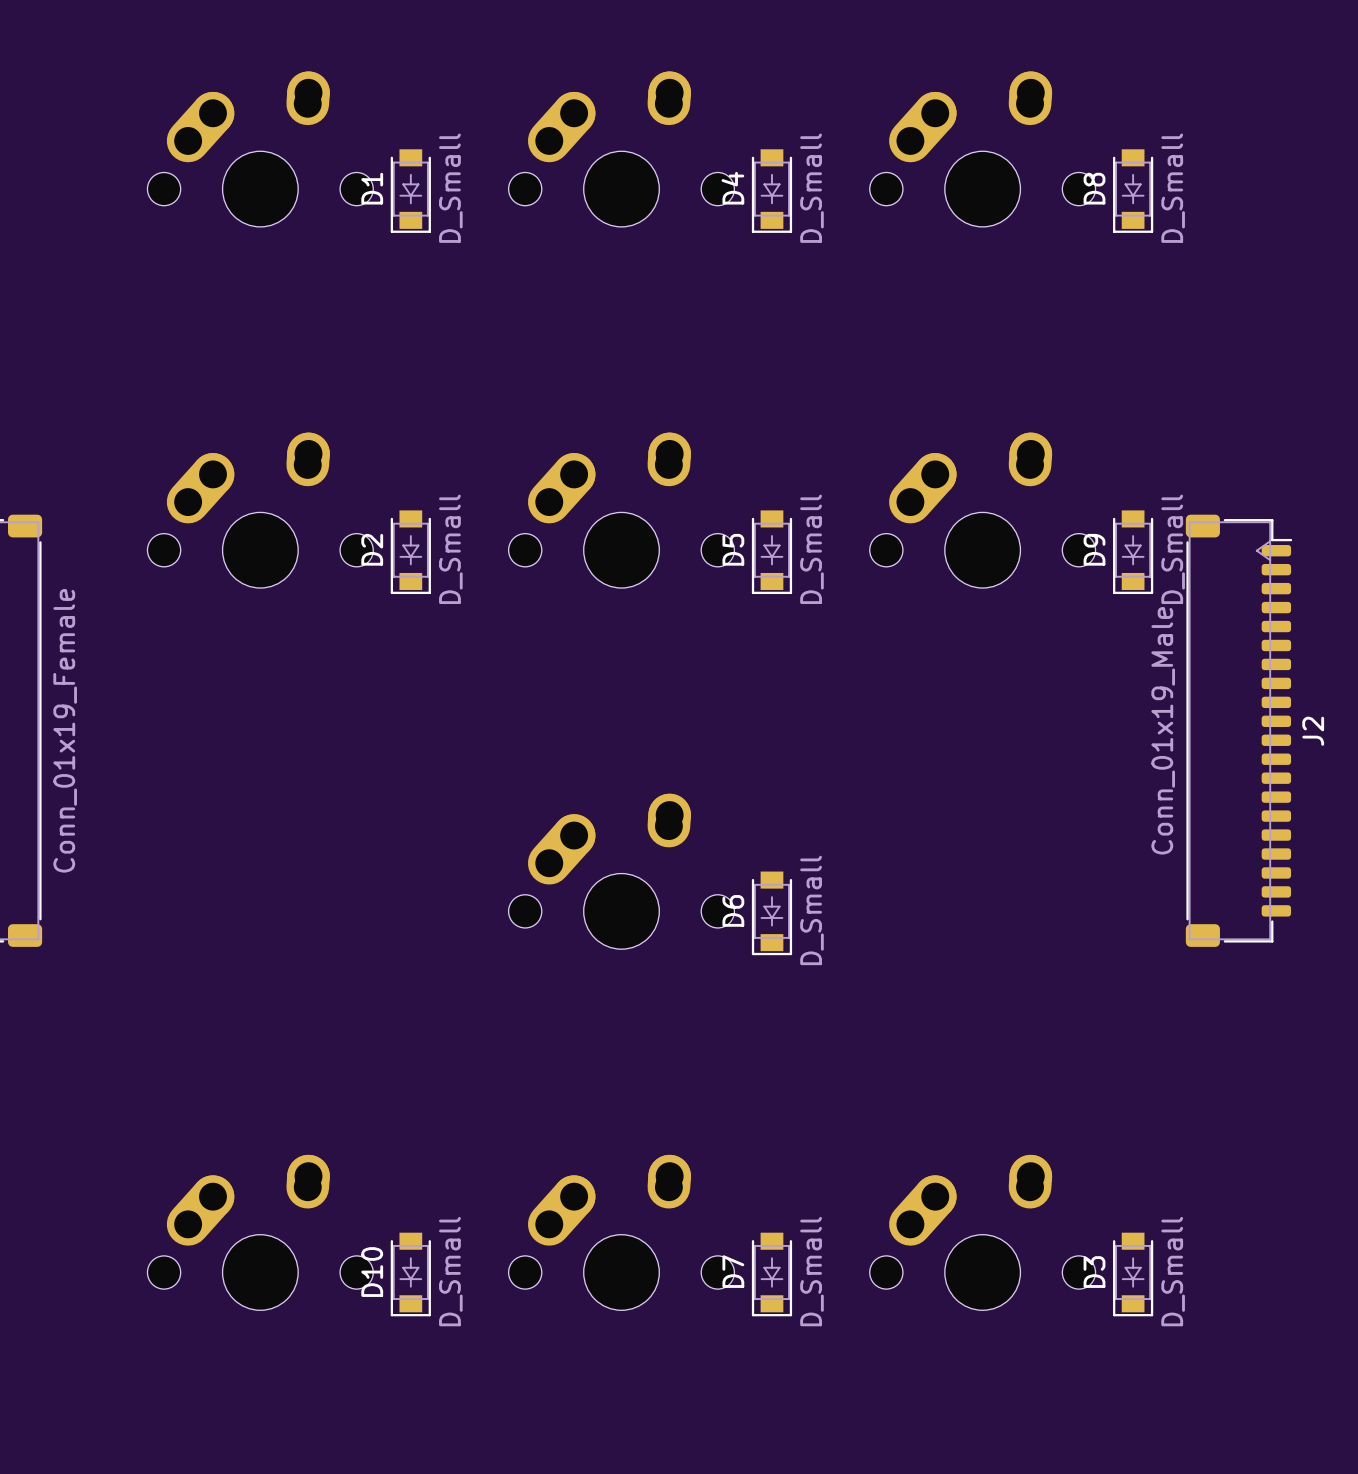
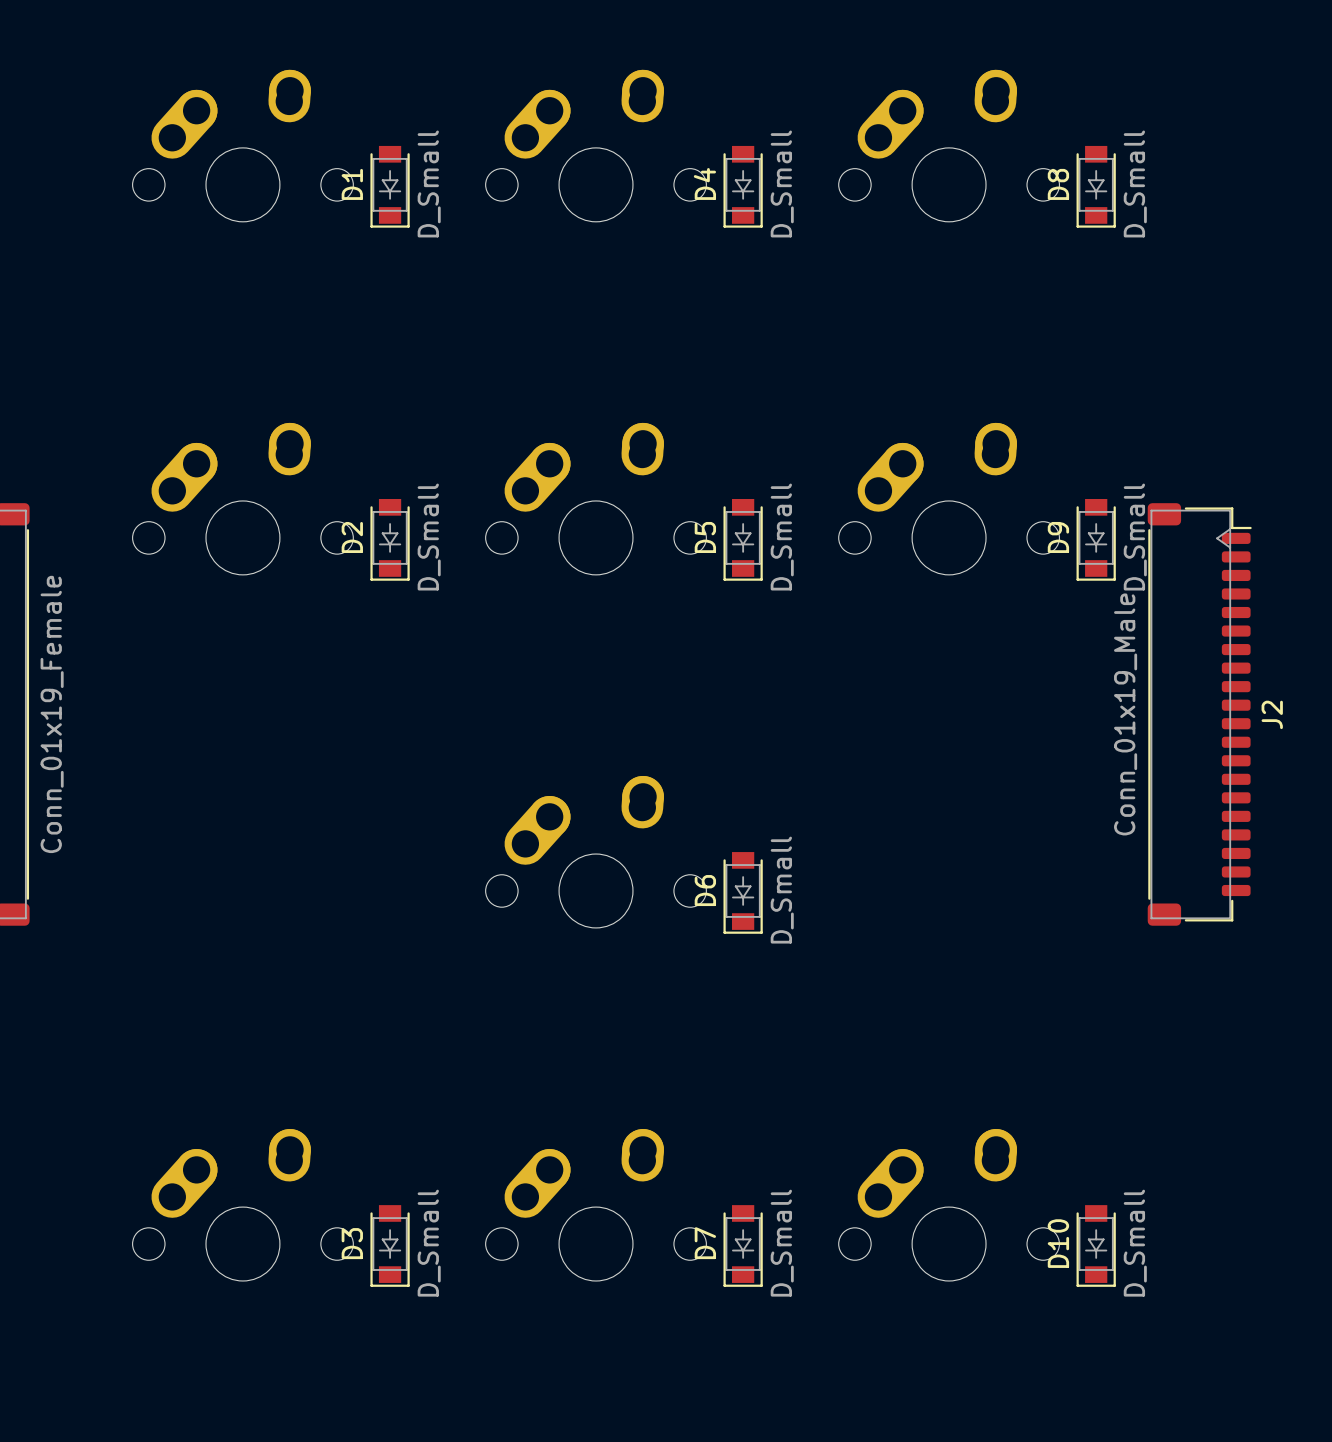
D10 name: D10 (372, 1272) -> D3 (352, 1243)
D3 name: D3 (1094, 1272) -> D10 (1058, 1243)

